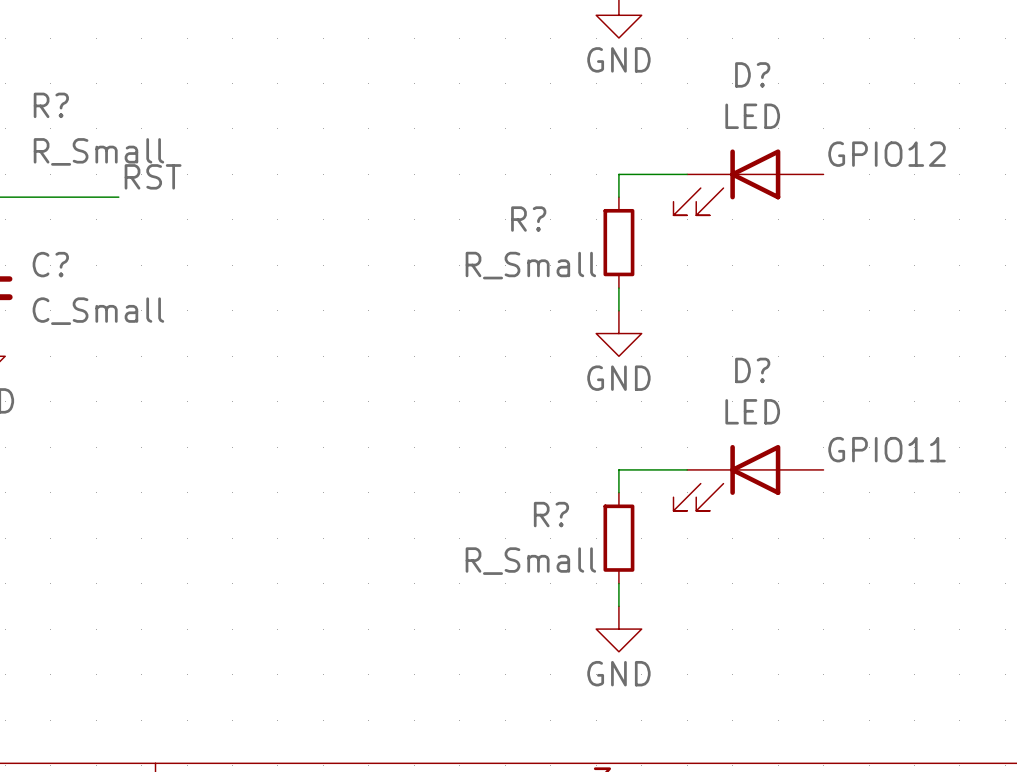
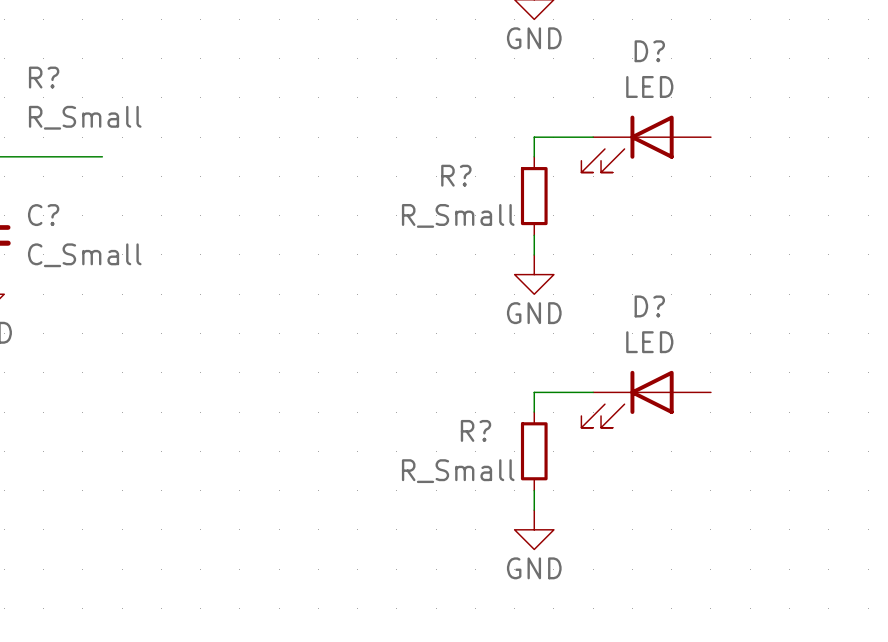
label: GPIO12 (887, 154) -> none
label: RST (153, 176) -> none
label: GPIO11 (887, 449) -> none

